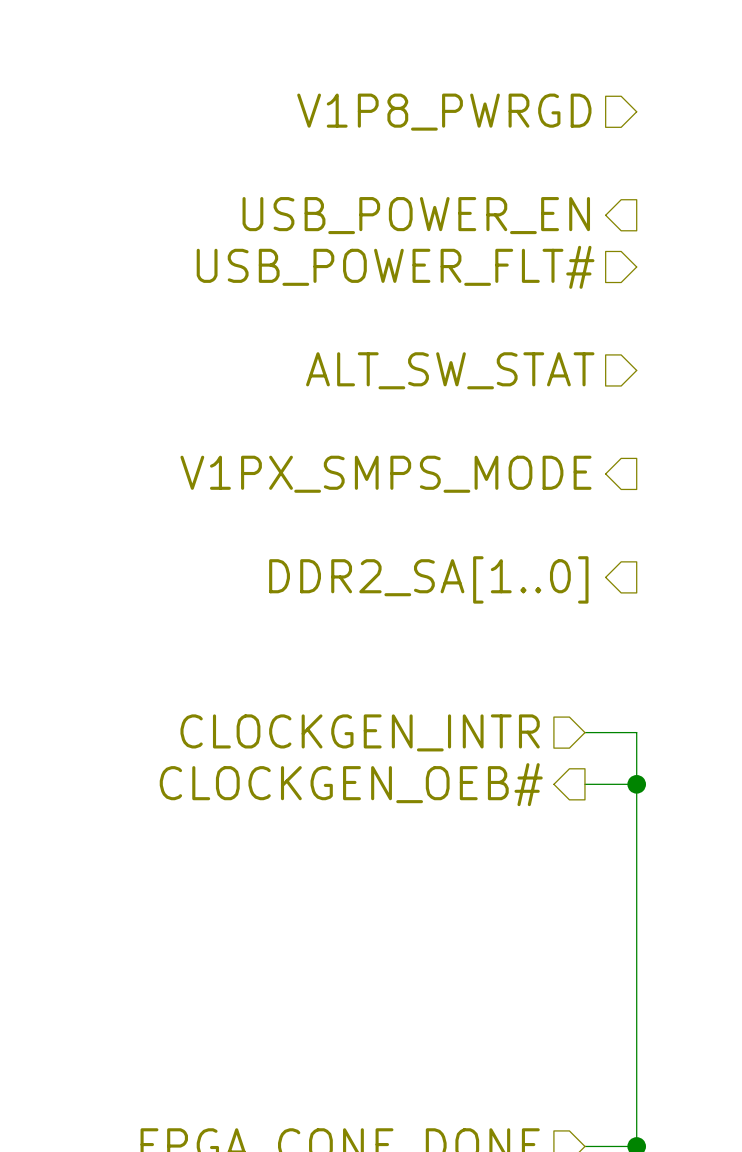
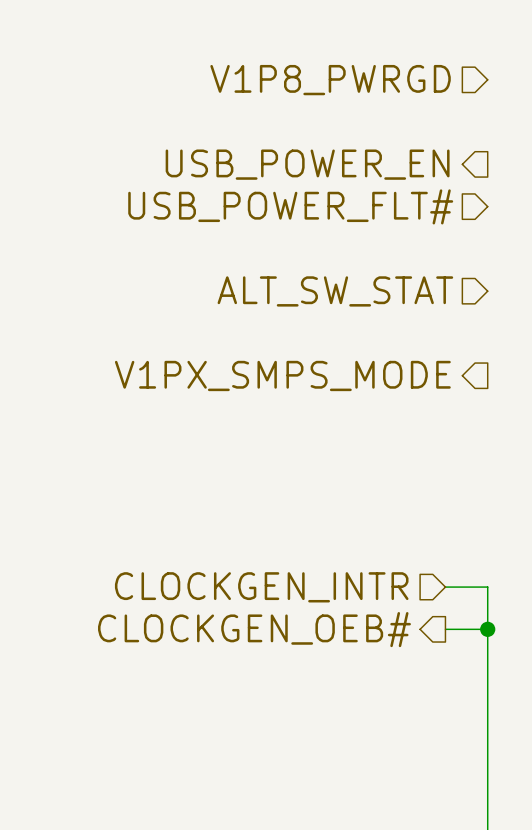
hierarchical label: DDR2_SA[1..0] (428, 579) -> none

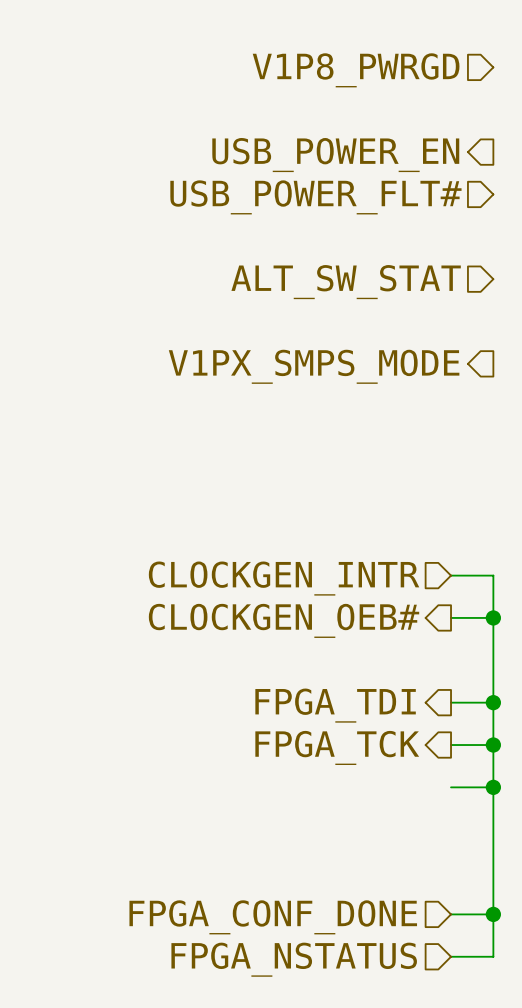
wire: none -> (451, 702) (493, 702)
junction: none -> (493, 702)
hierarchical label: none -> FPGA_TDI (335, 705)
hierarchical label: none -> FPGA_TCK (337, 747)
wire: none -> (451, 745) (493, 745)
junction: none -> (493, 745)
wire: none -> (451, 787) (493, 787)
junction: none -> (493, 787)

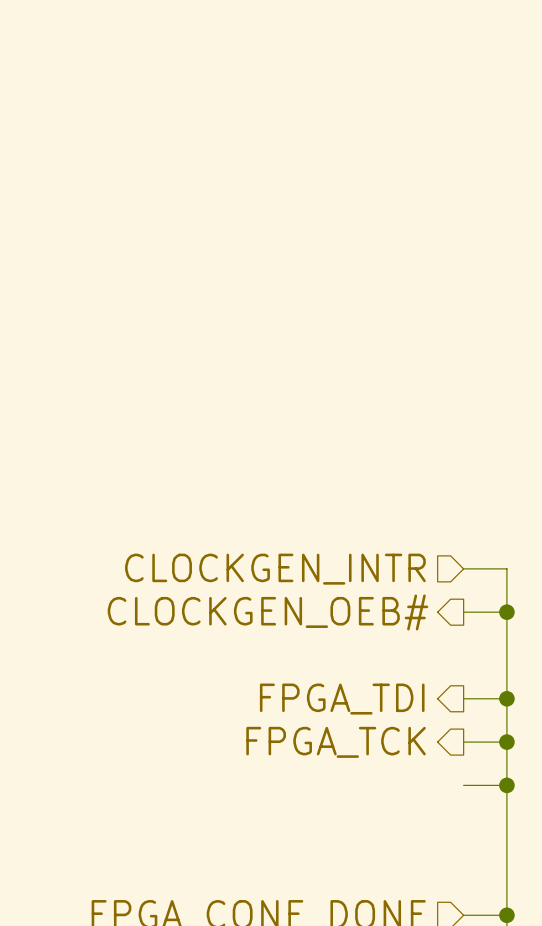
hierarchical label: V1P8_PWRGD (356, 70) -> none
hierarchical label: USB_POWER_EN (335, 155) -> none
hierarchical label: USB_POWER_FLT# (315, 197) -> none
hierarchical label: ALT_SW_STAT (346, 282) -> none
hierarchical label: V1PX_SMPS_MODE (314, 366) -> none

